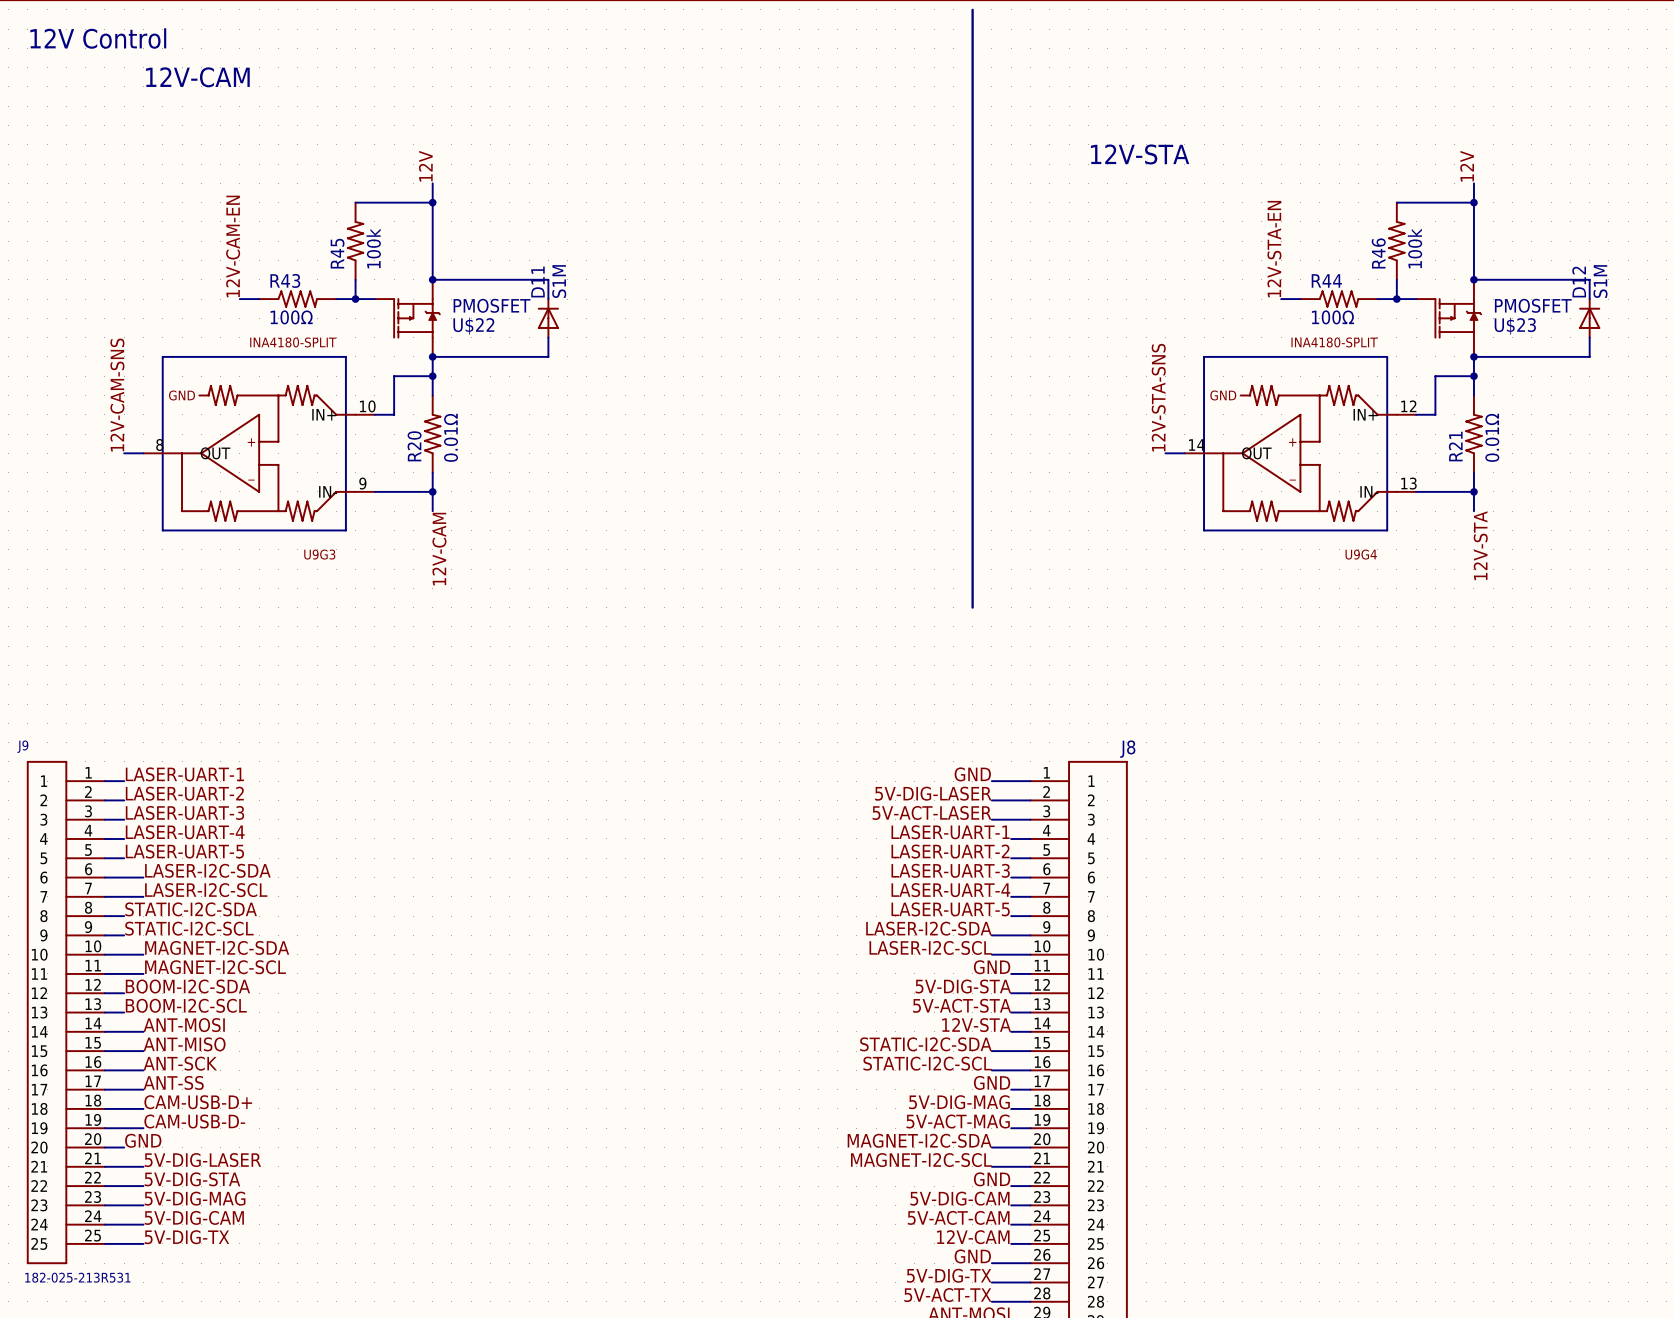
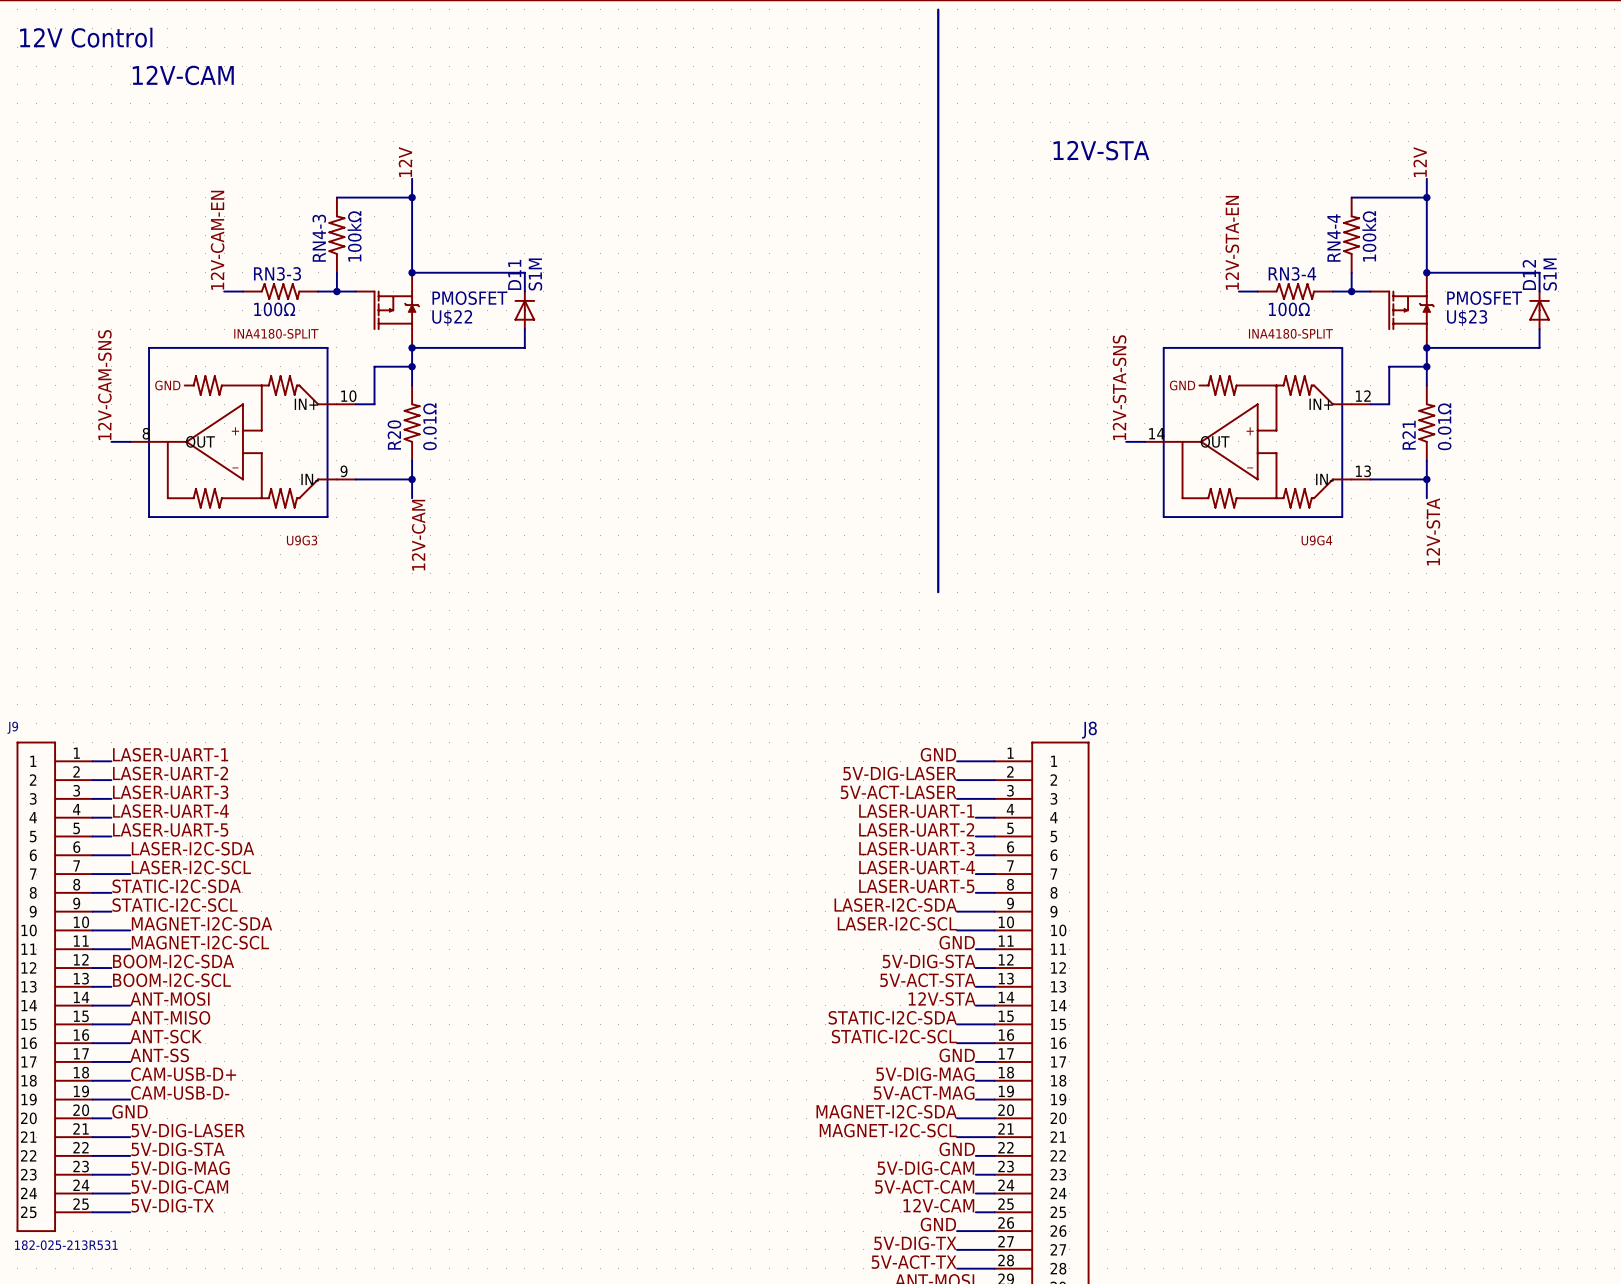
R45 value: 100k (373, 248) -> 100kΩ (354, 236)
R46 value: 100k (1415, 248) -> 100kΩ (1369, 236)
R45 name: R45 (337, 253) -> RN4-3 (319, 238)
R46 name: R46 (1378, 253) -> RN4-4 (1333, 238)
R43 name: R43 (285, 280) -> RN3-3 (277, 273)
R44 name: R44 (1326, 280) -> RN3-4 (1292, 273)

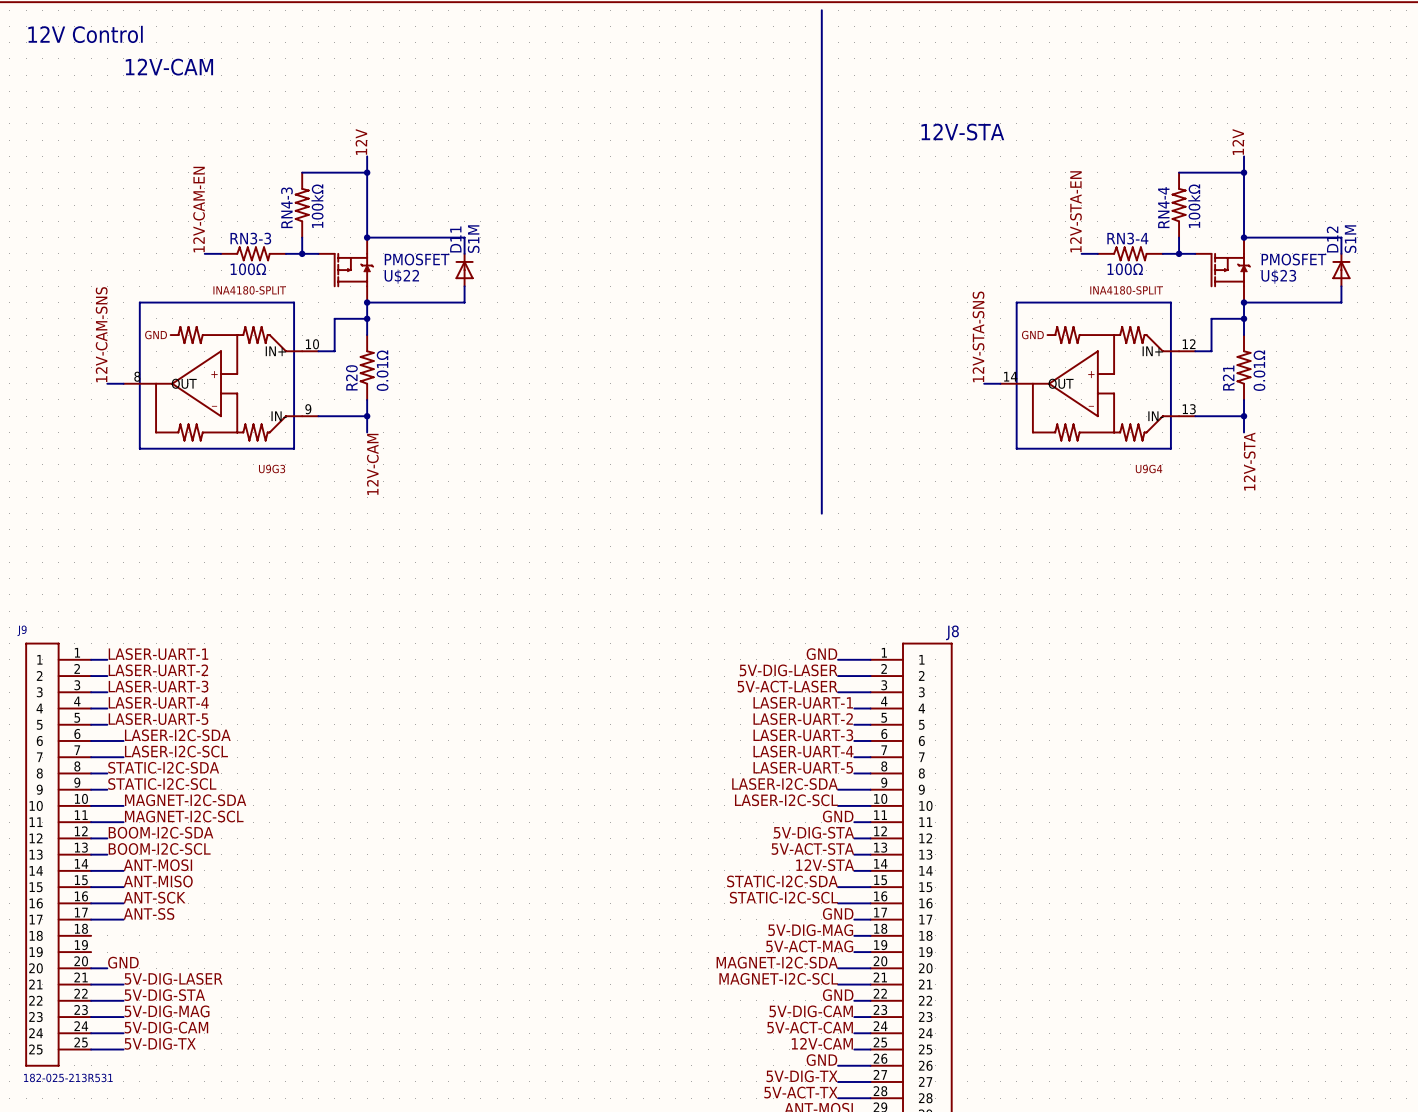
label: CAM-USB-D+ (183, 1074) -> none
wire: (92, 1080) (130, 1080) -> none
label: CAM-USB-D- (180, 1092) -> none
wire: (92, 1099) (130, 1099) -> none

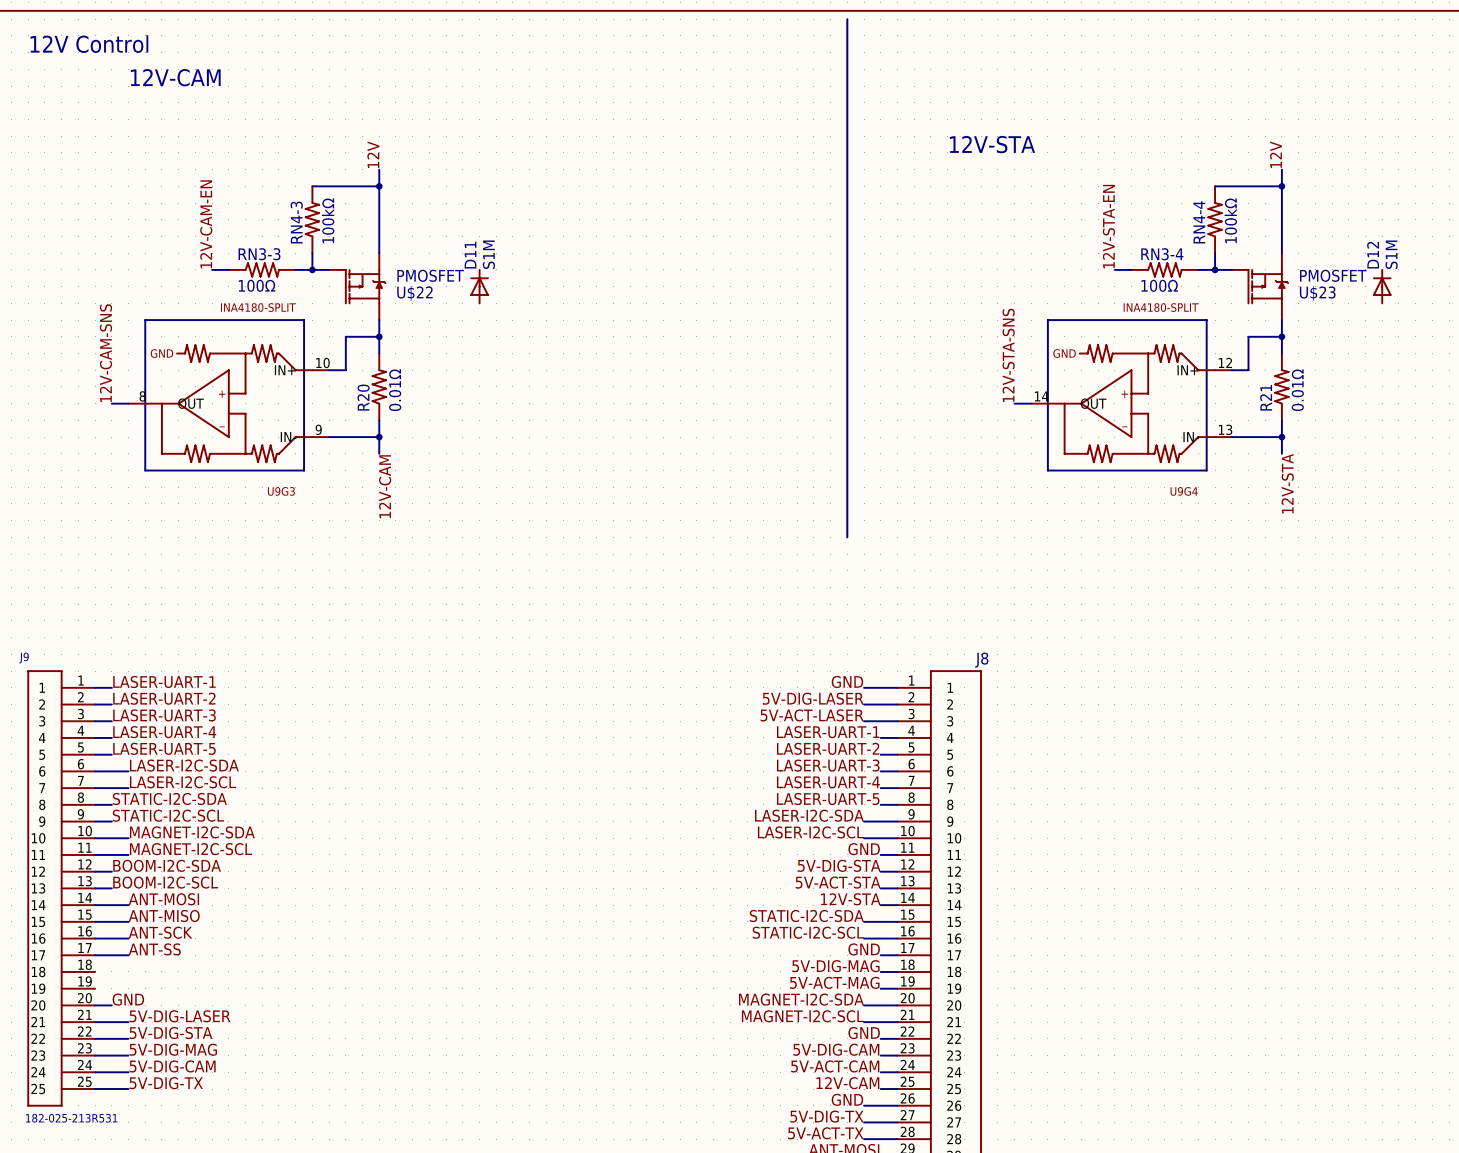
wire: (367, 237) (464, 237) (464, 253) -> none
junction: (367, 237) -> none
wire: (1244, 237) (1341, 237) (1341, 253) -> none
junction: (1244, 237) -> none
wire: (464, 286) (464, 302) (367, 302) -> none
wire: (1341, 286) (1341, 302) (1244, 302) -> none
junction: (367, 302) -> none
junction: (1244, 302) -> none

